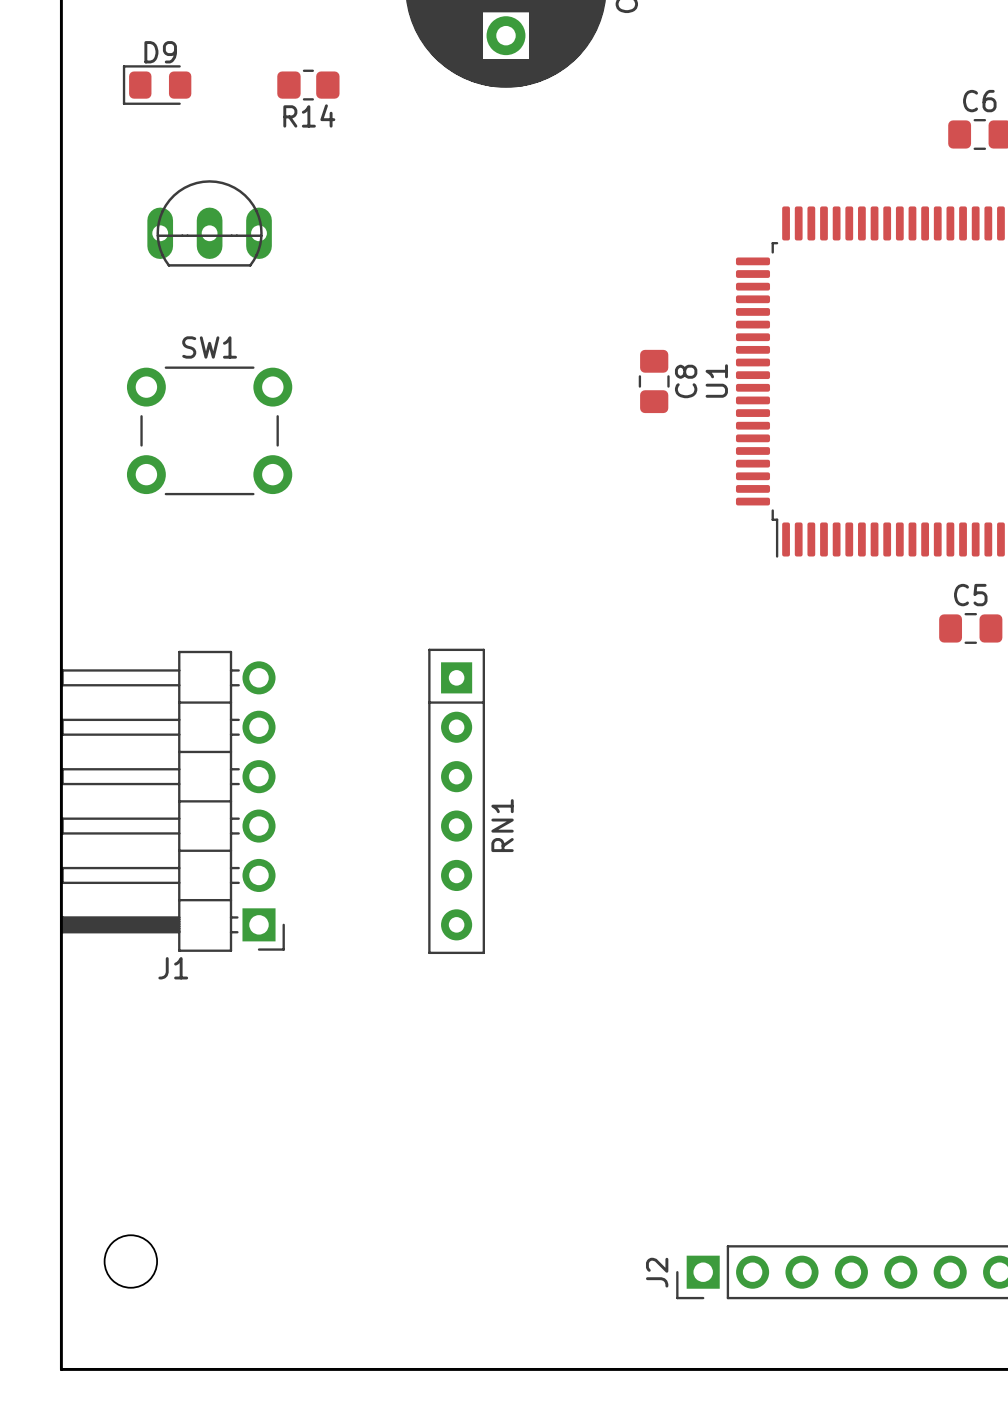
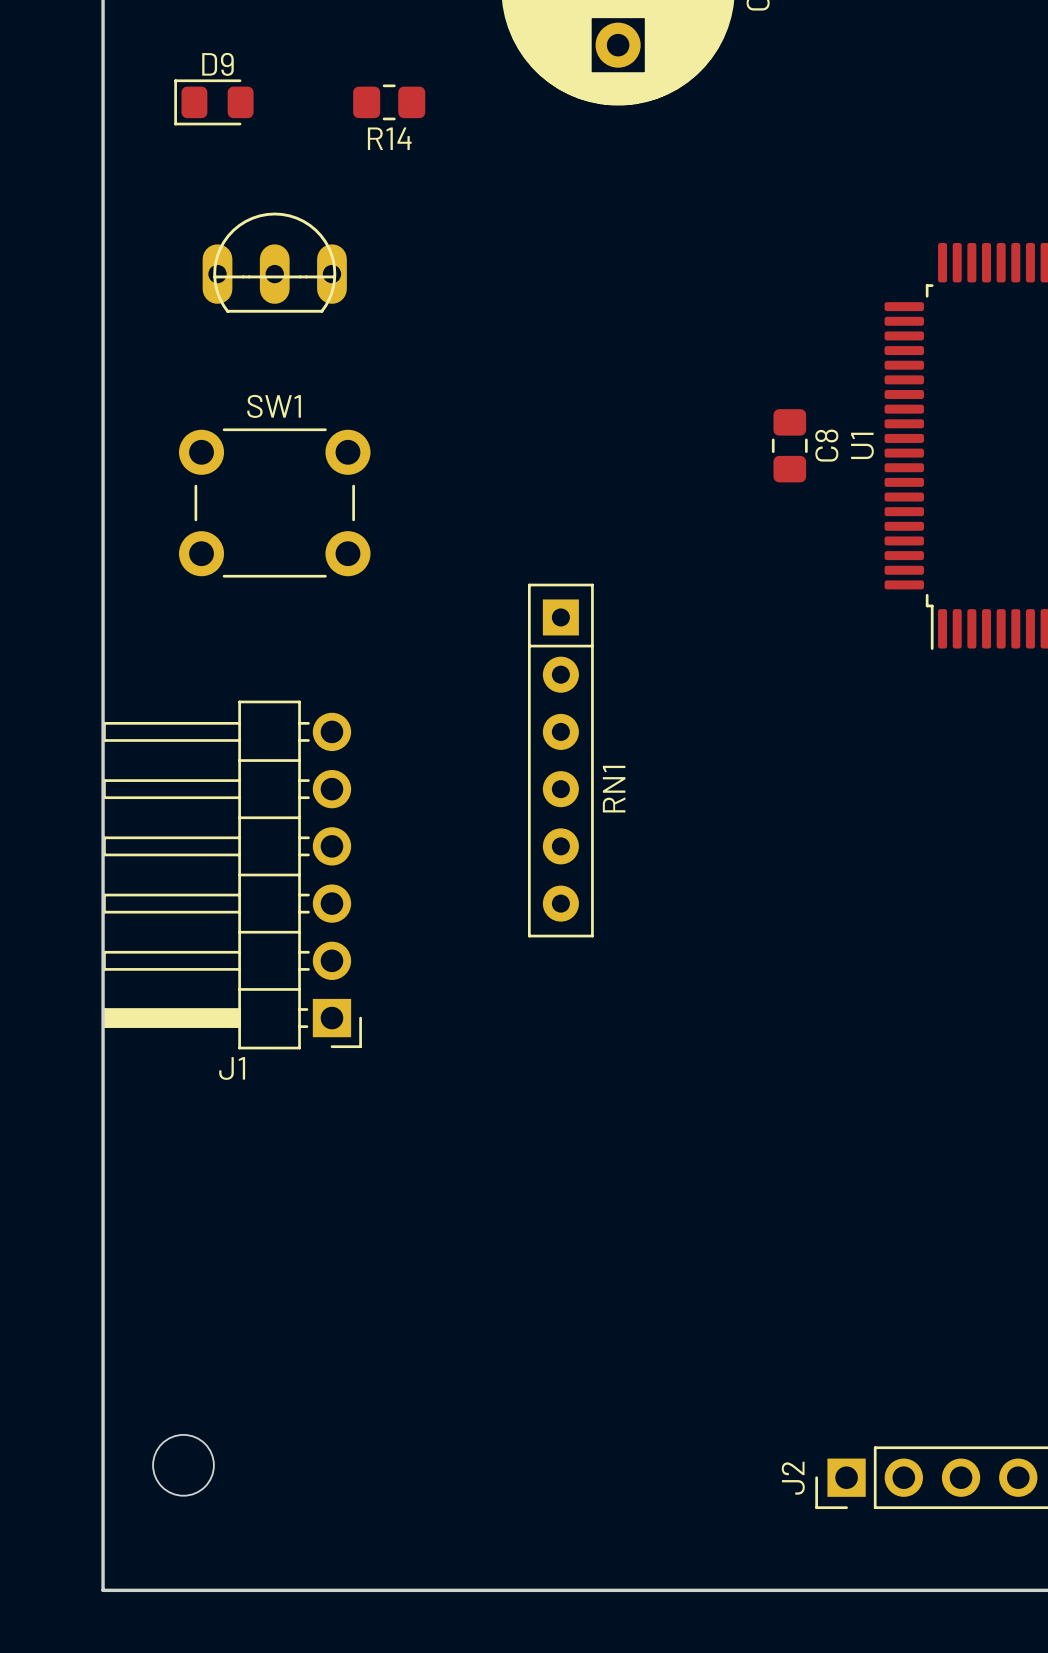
J1 position: (173, 801) -> (232, 874)
RN1 position: (456, 801) -> (560, 760)

